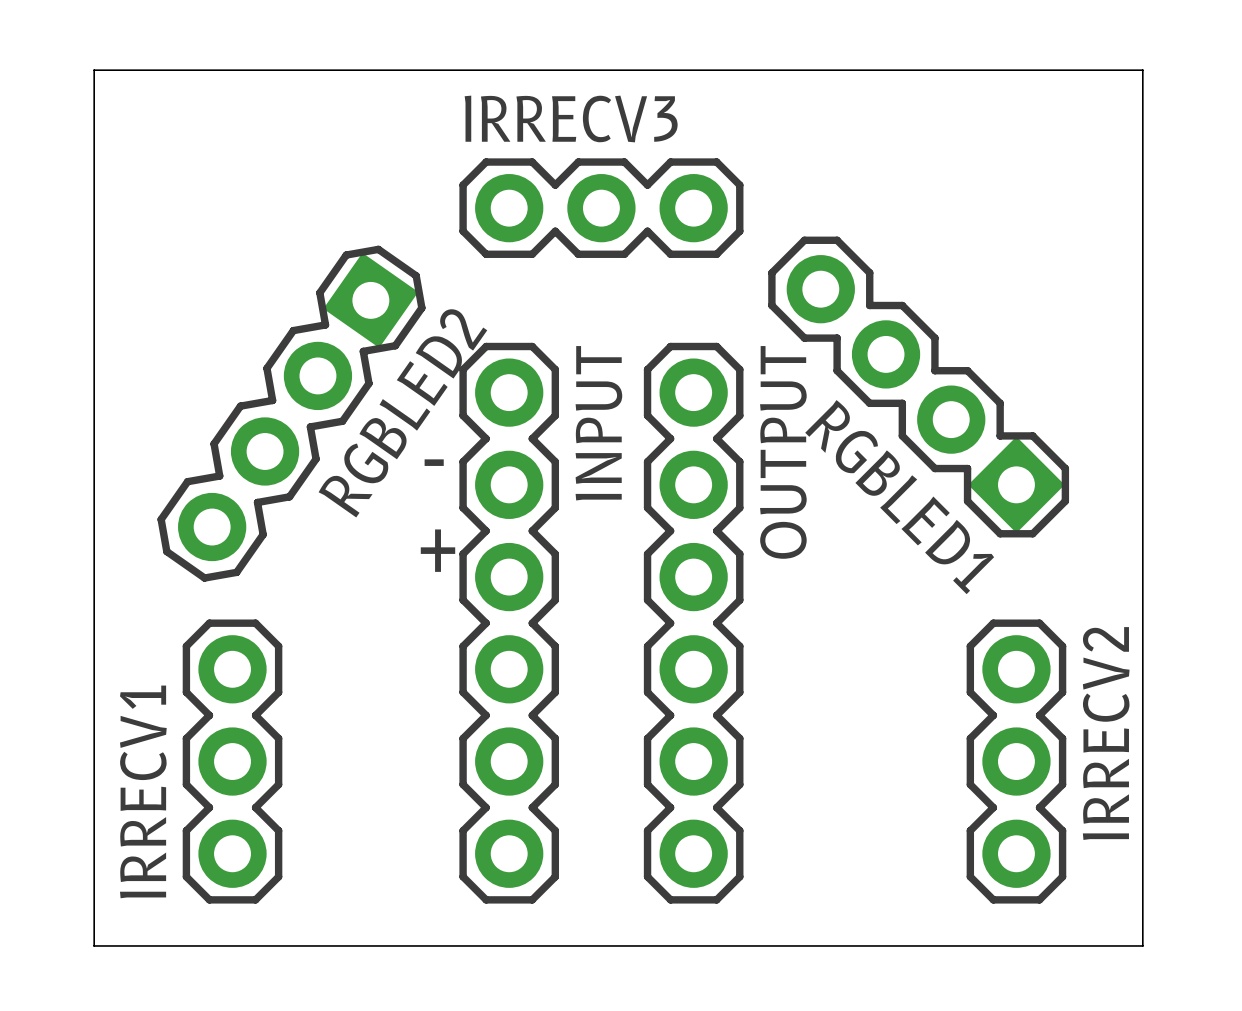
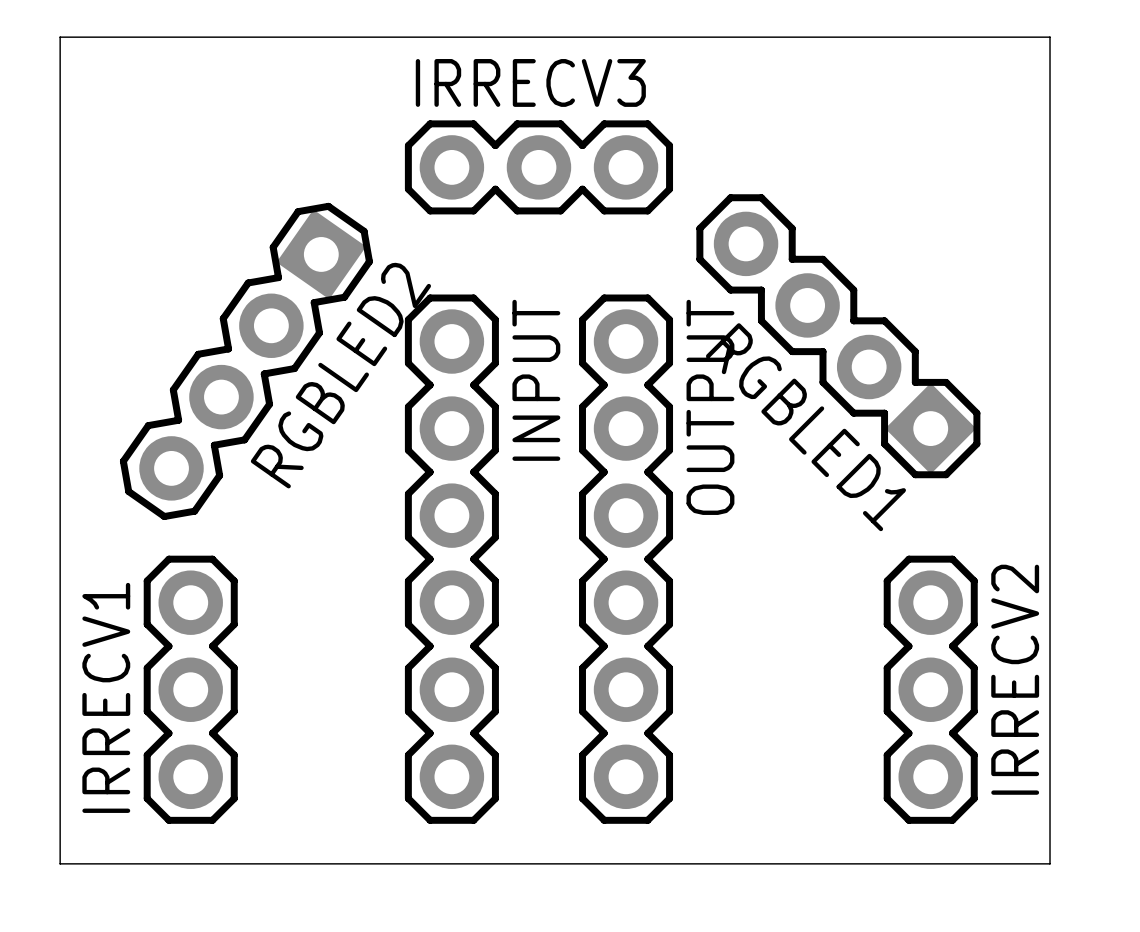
text: - (434, 462) -> none
text: + (438, 550) -> none

